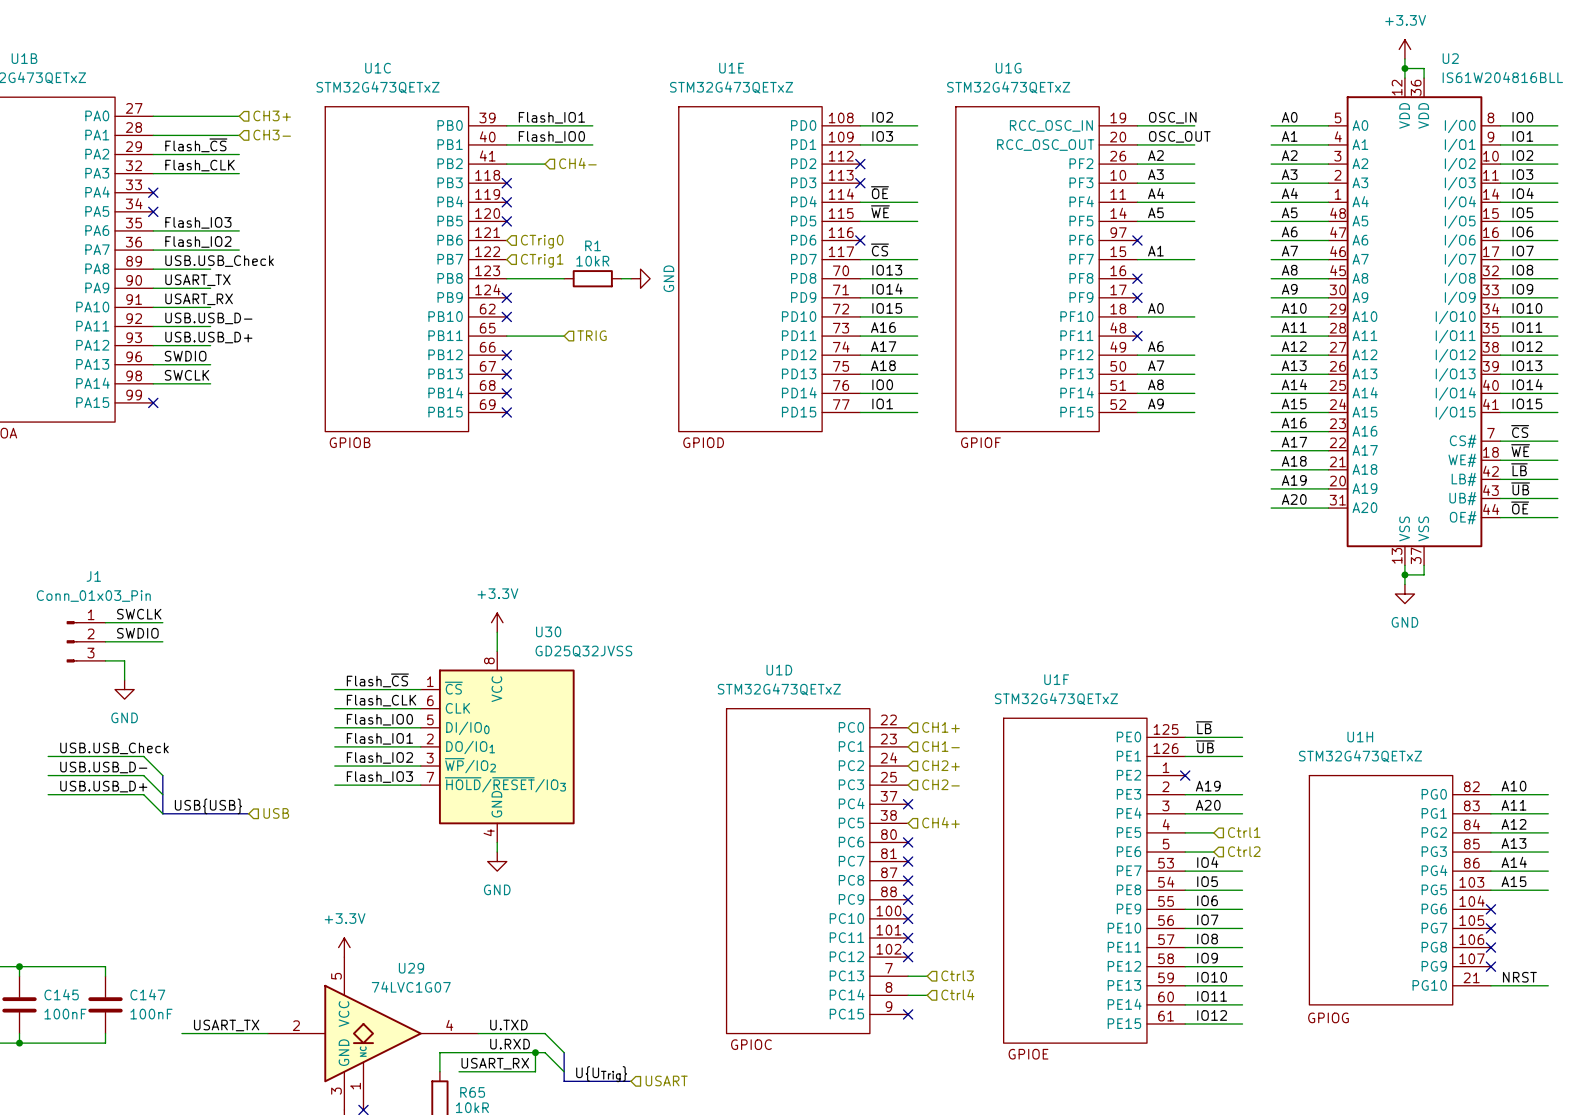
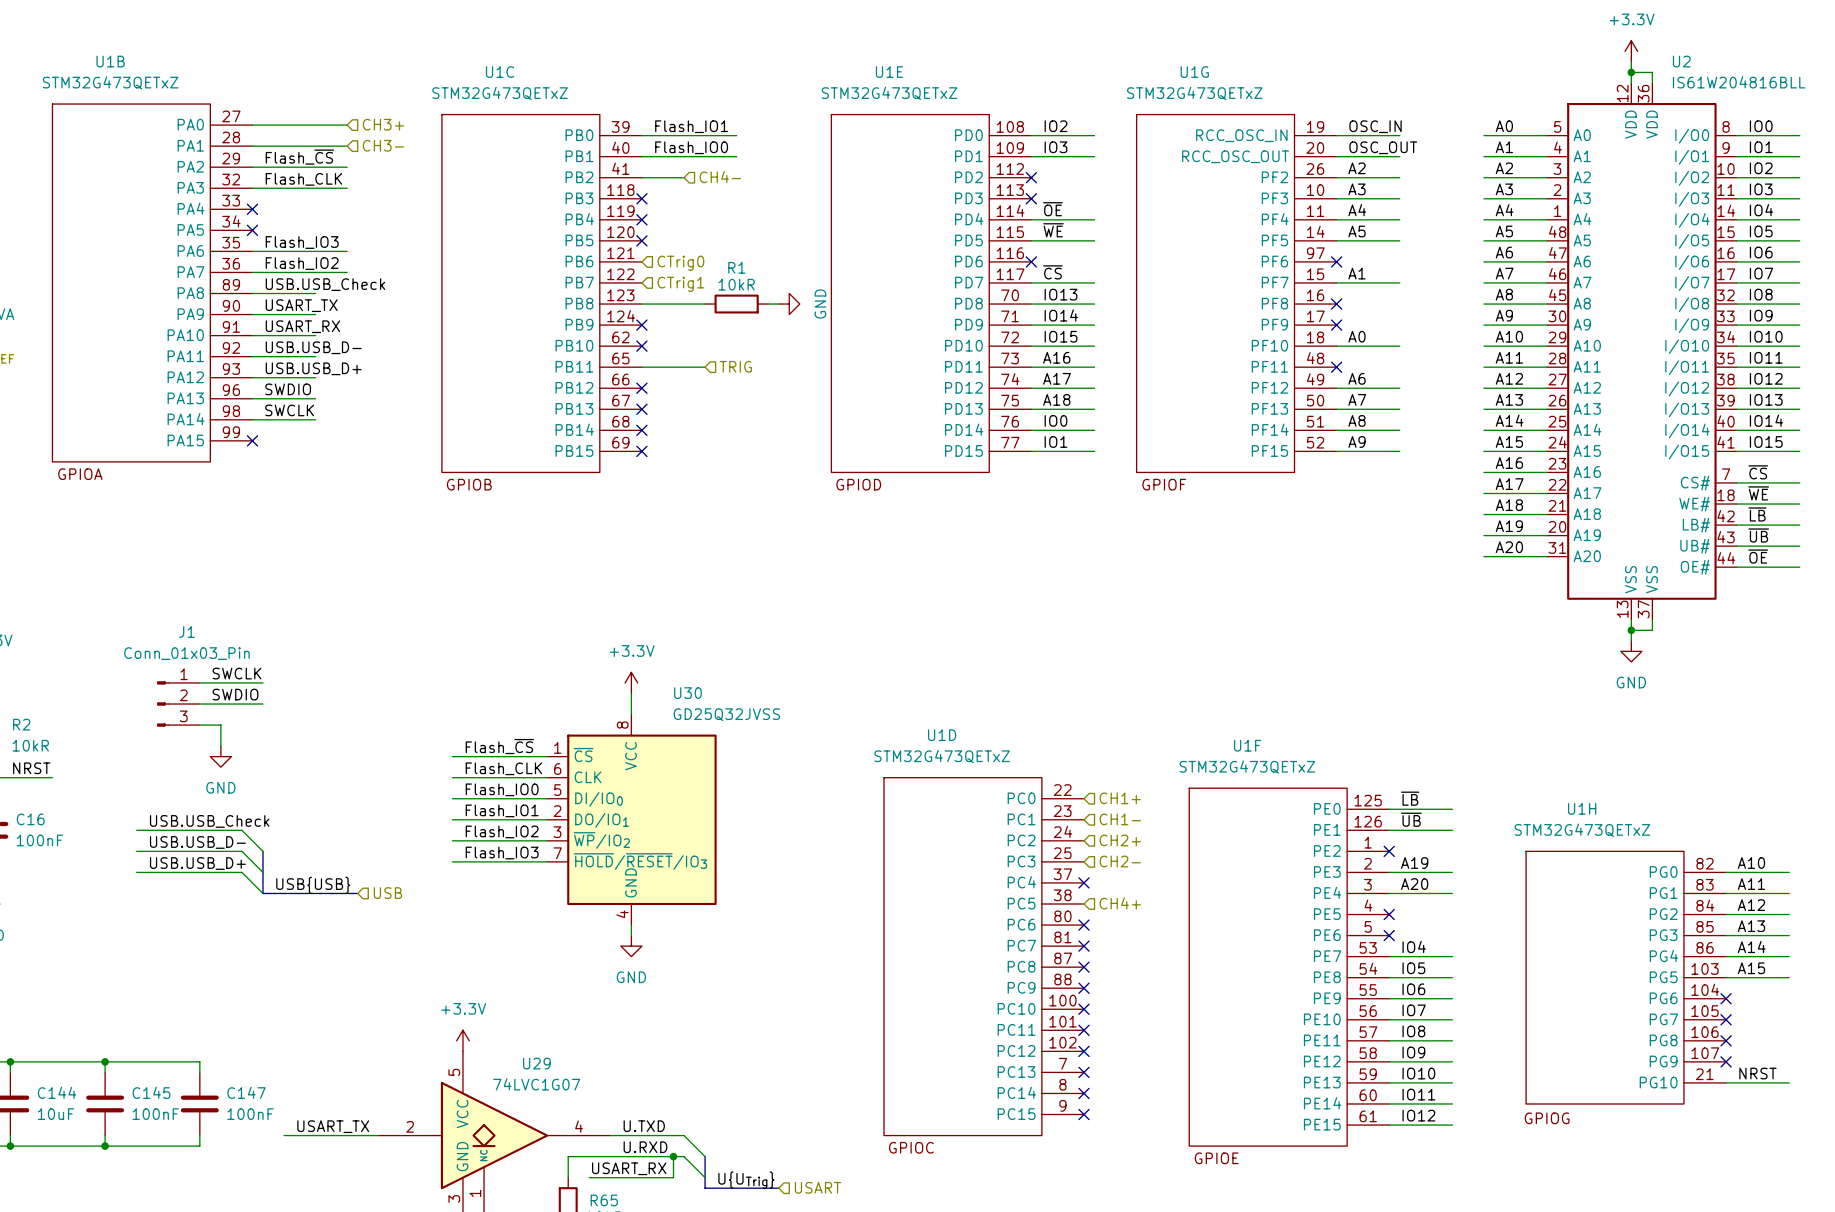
wire: (1185, 832) (1213, 832) -> none
no-connect mark: none -> (1389, 914)
hierarchical label: Ctrl1 (1244, 832) -> none
hierarchical label: Ctrl2 (1244, 851) -> none
wire: (1185, 852) (1213, 852) -> none
no-connect mark: none -> (1389, 935)
hierarchical label: Ctrl3 (957, 975) -> none
wire: (908, 976) (927, 976) -> none
no-connect mark: none -> (1083, 1072)
hierarchical label: Ctrl4 (957, 994) -> none
wire: (908, 995) (927, 995) -> none
no-connect mark: none -> (1083, 1093)

